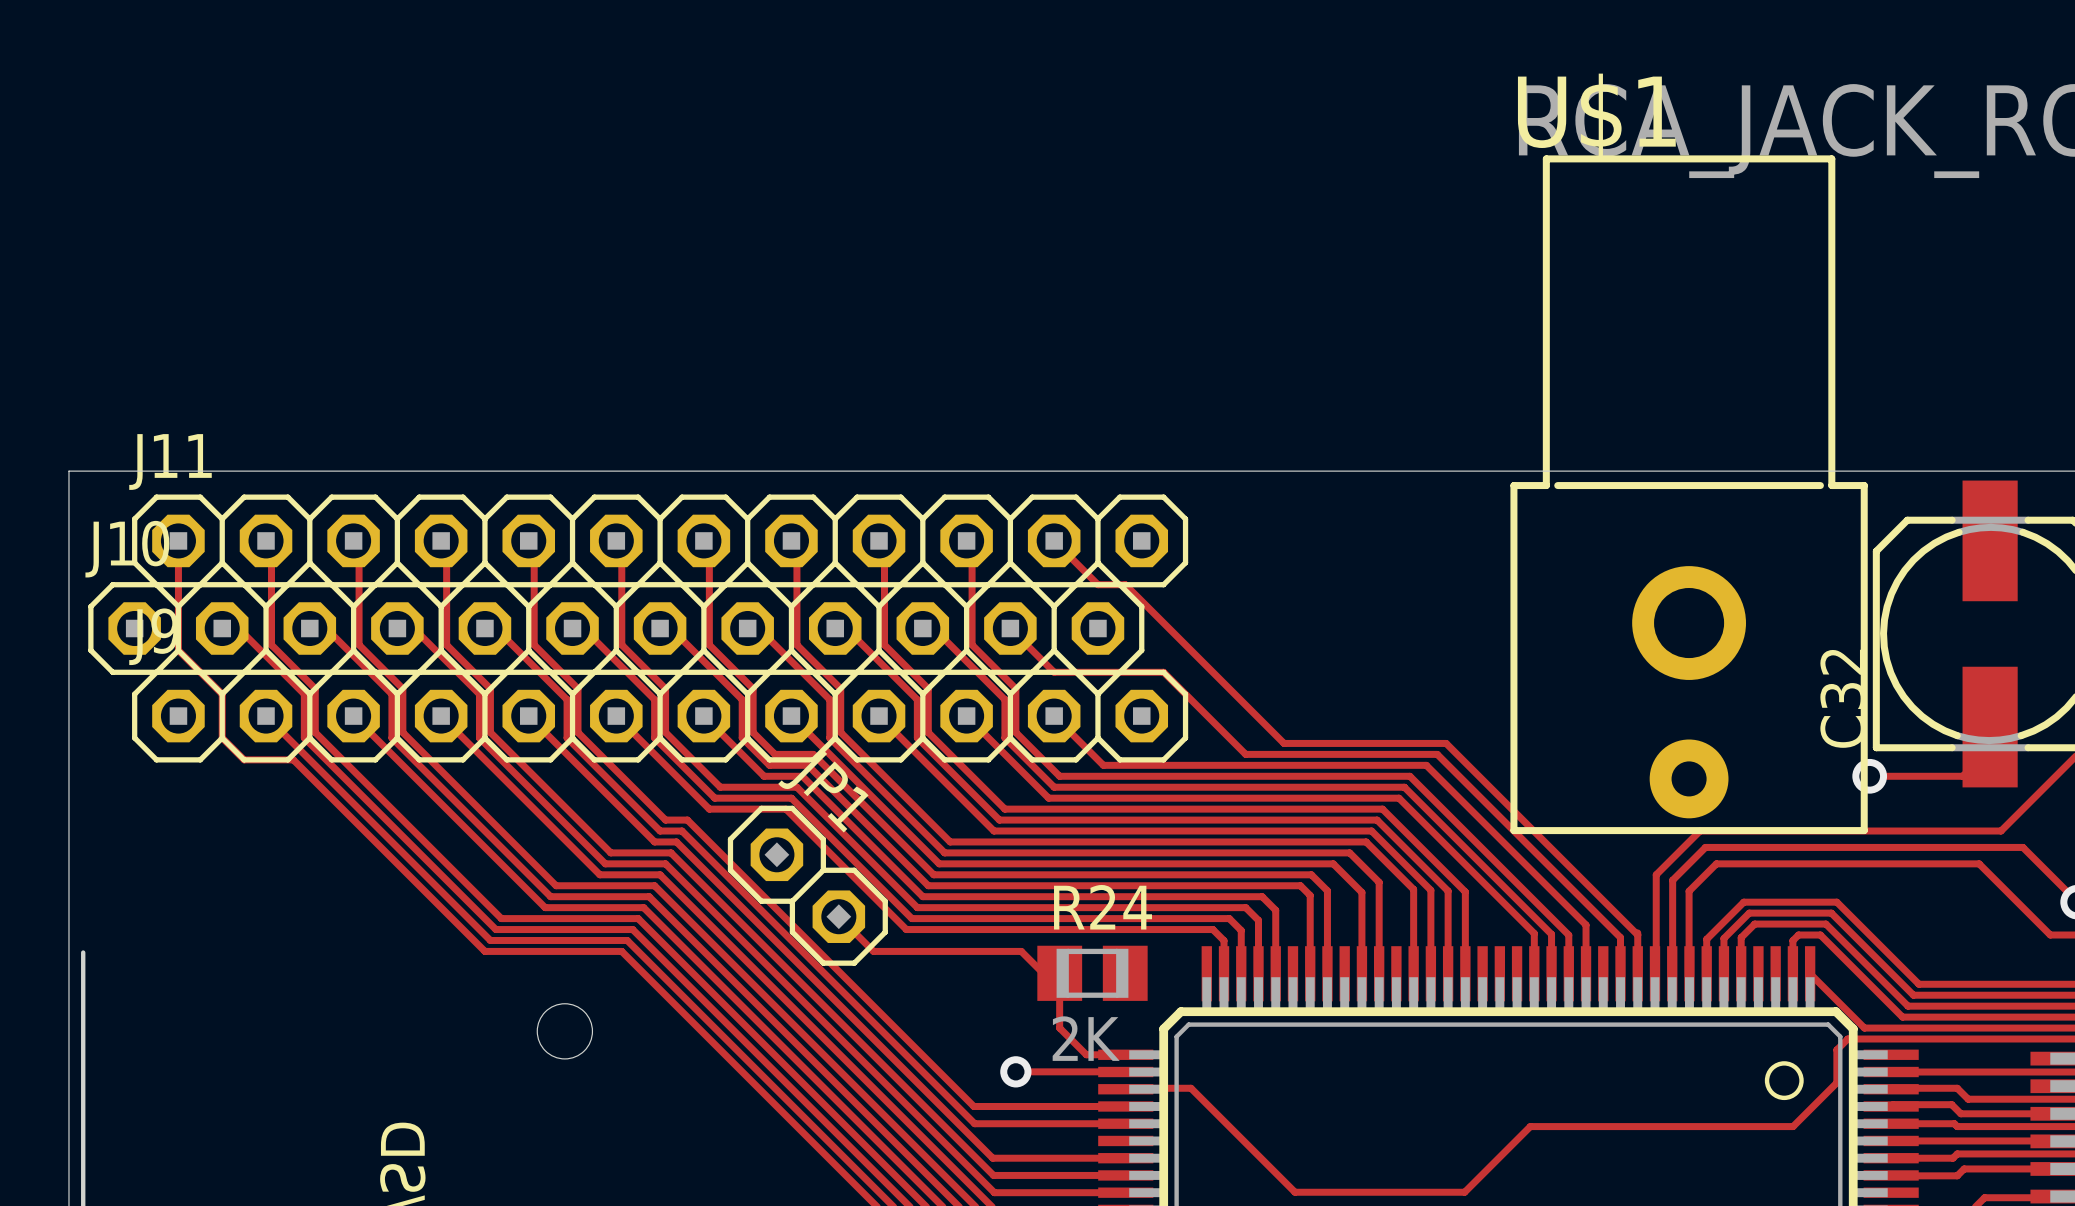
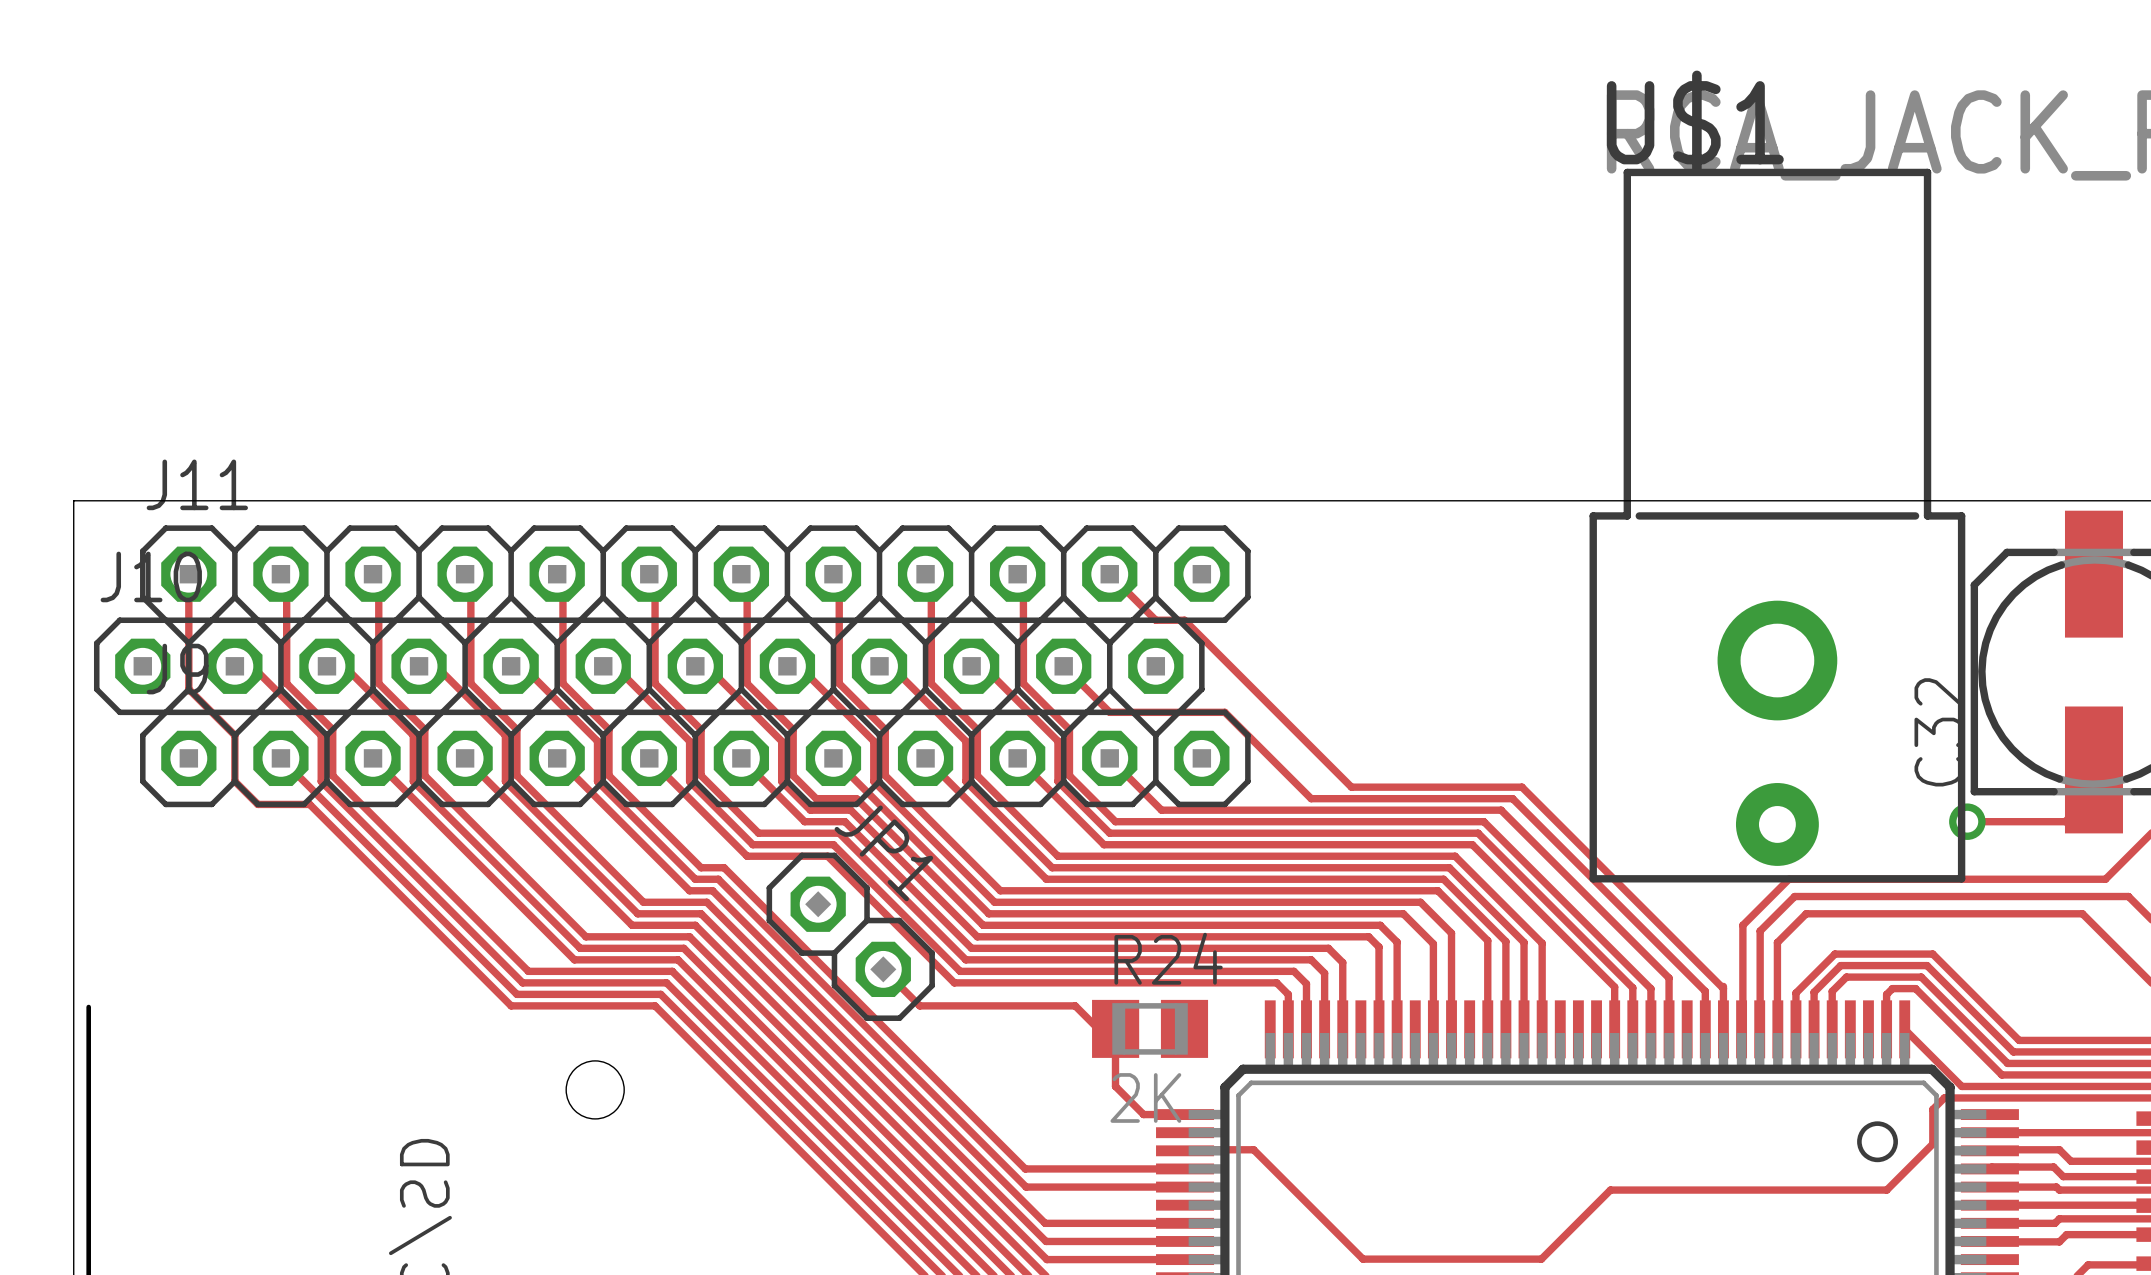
track: (1015, 1071) (1125, 1071) -> none
via: (1015, 1071) -> none

